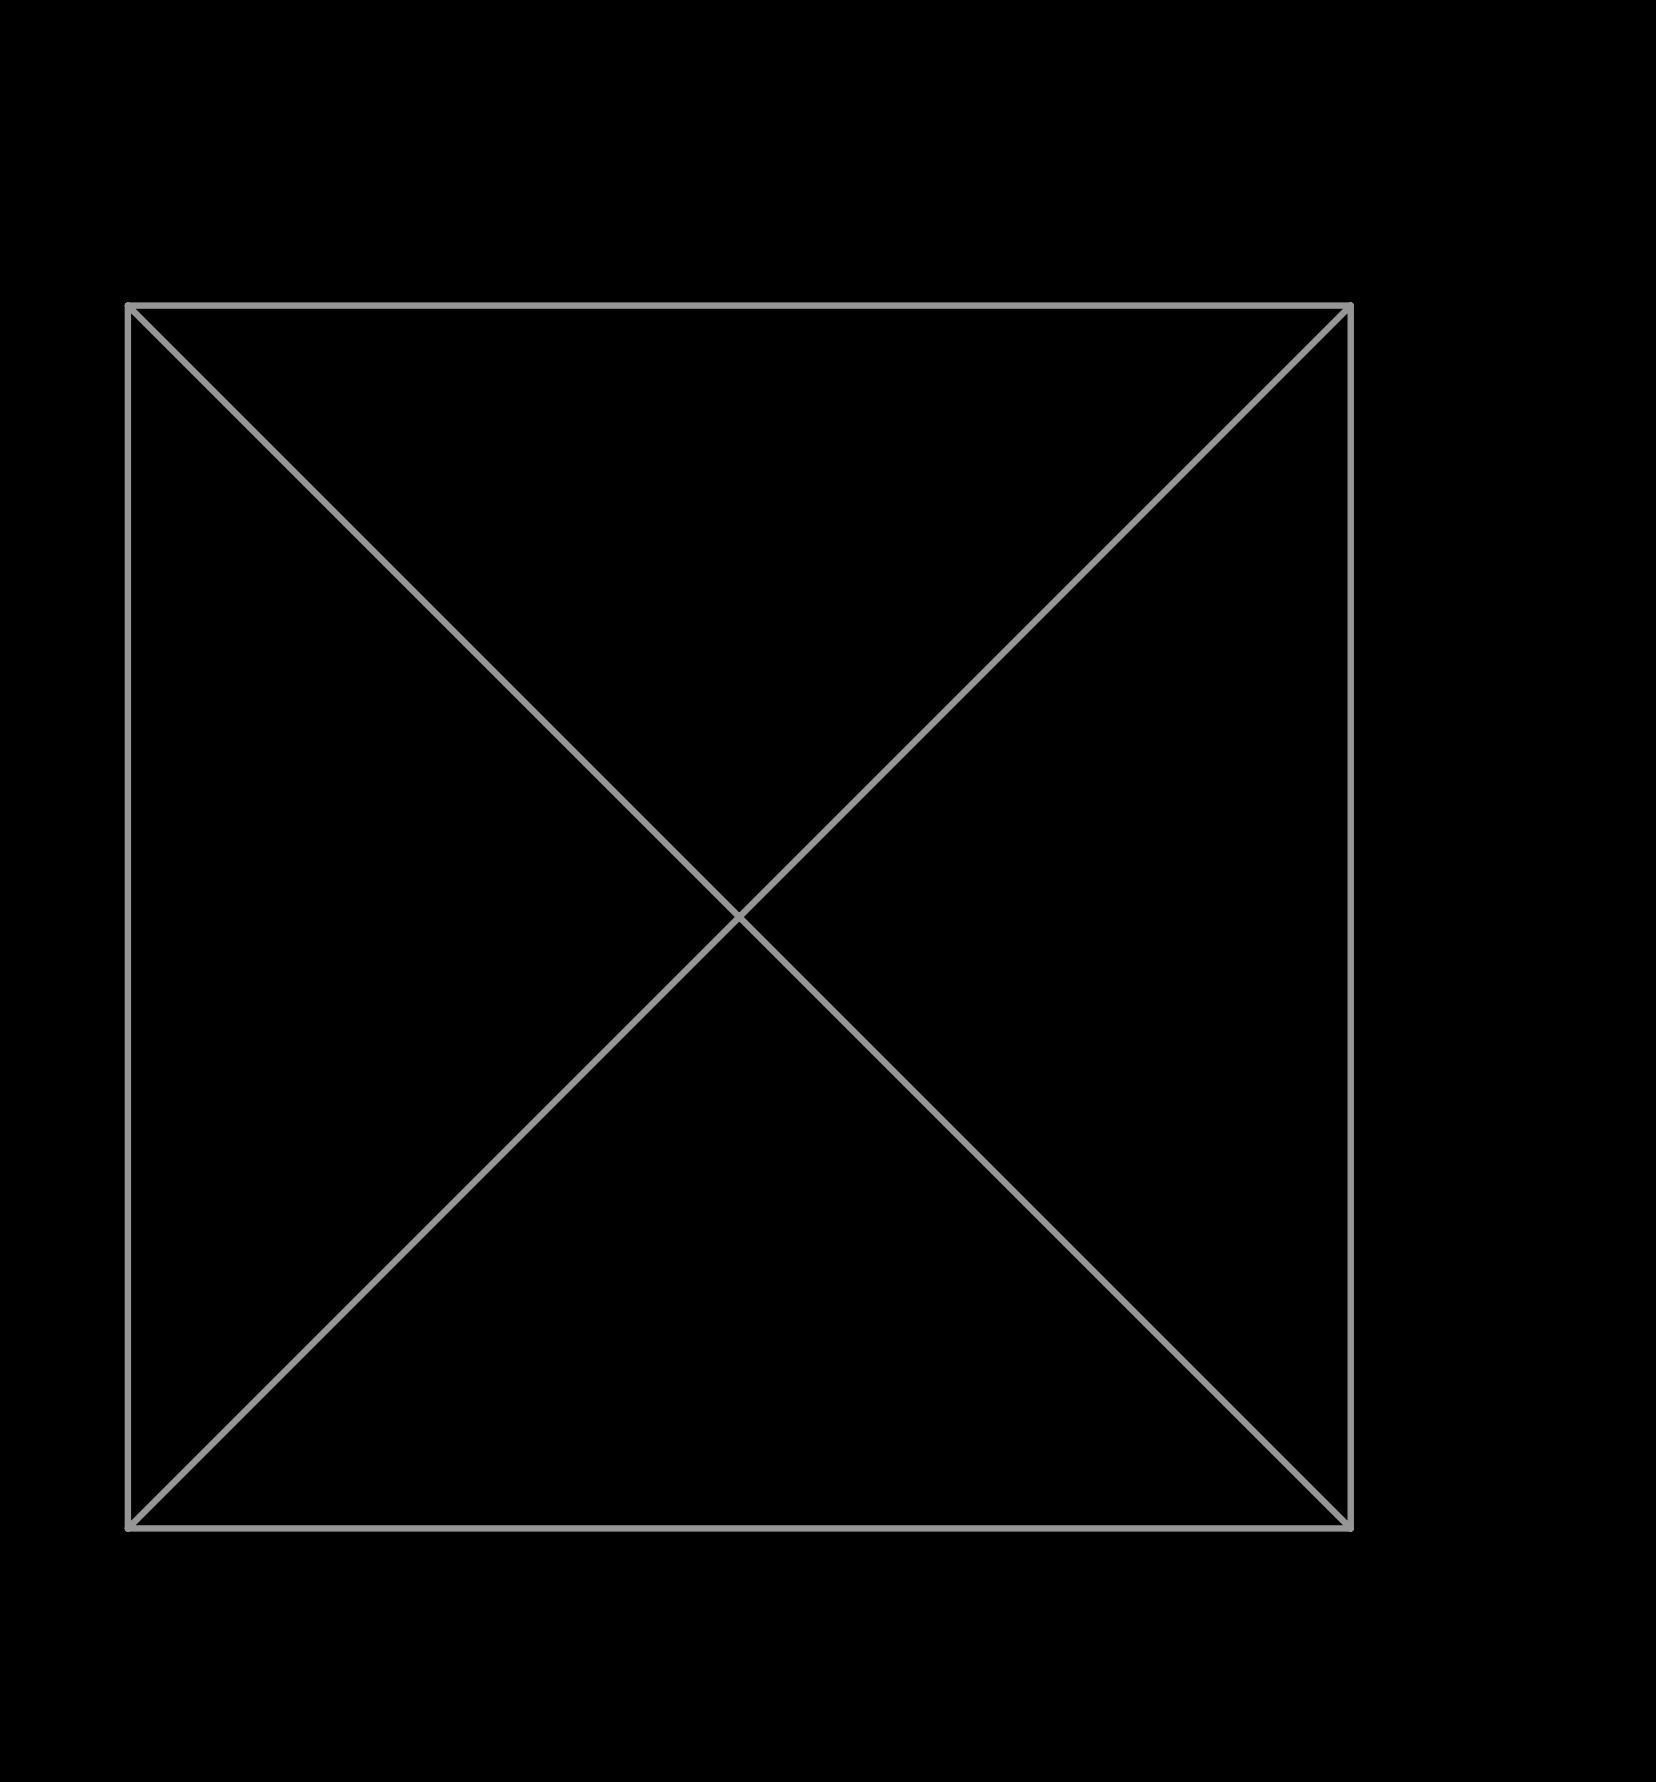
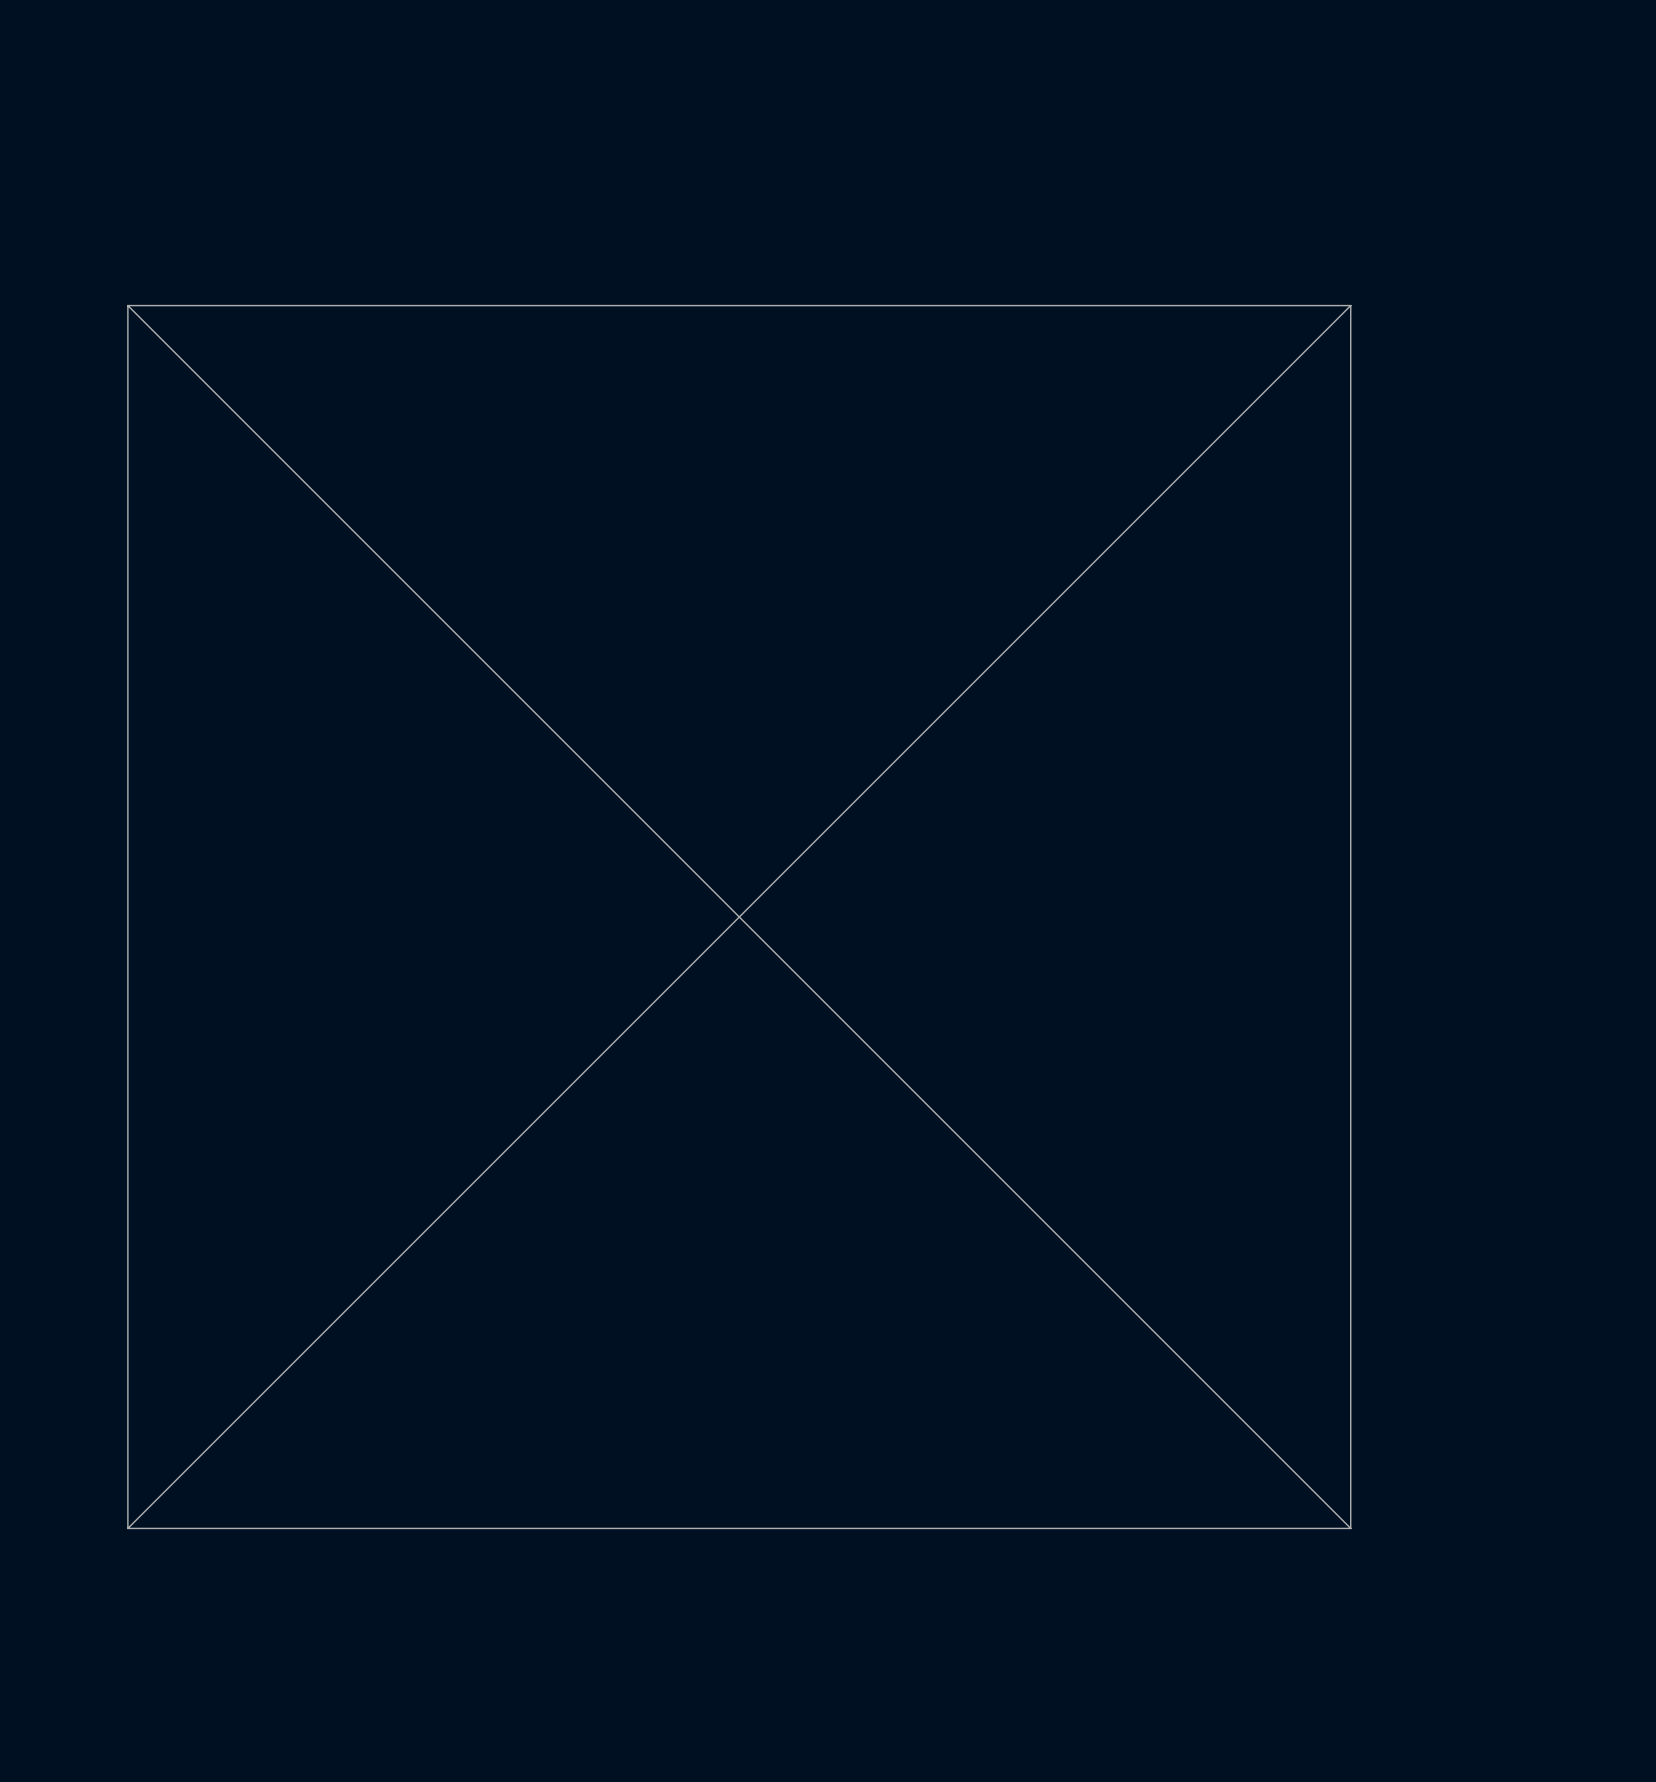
line width: thick (127, 305) (1350, 305) -> thin (127, 305) (1350, 305)
line width: thick (127, 305) (1350, 1528) -> thin (127, 305) (1350, 1528)
line width: thick (127, 305) (127, 1528) -> thin (127, 305) (127, 1528)
line width: thick (1350, 305) (127, 1528) -> thin (1350, 305) (127, 1528)
line width: thick (1350, 305) (1350, 1528) -> thin (1350, 305) (1350, 1528)
line width: thick (127, 1528) (1350, 1528) -> thin (127, 1528) (1350, 1528)

